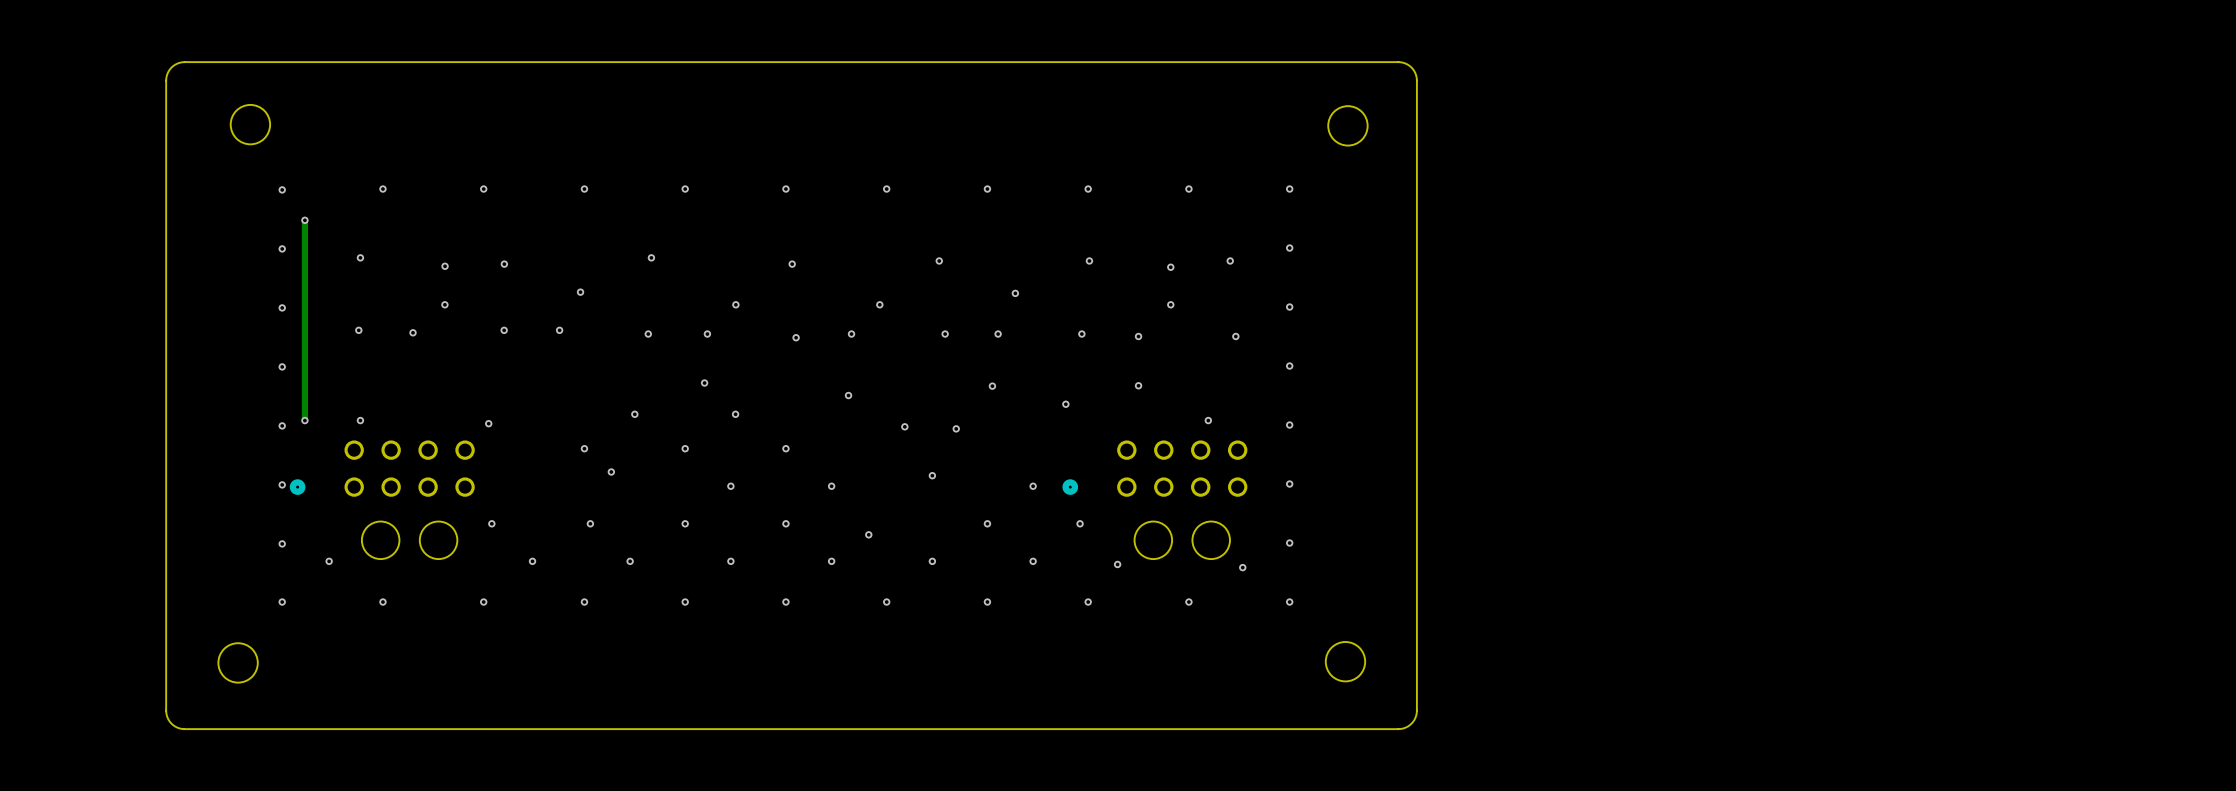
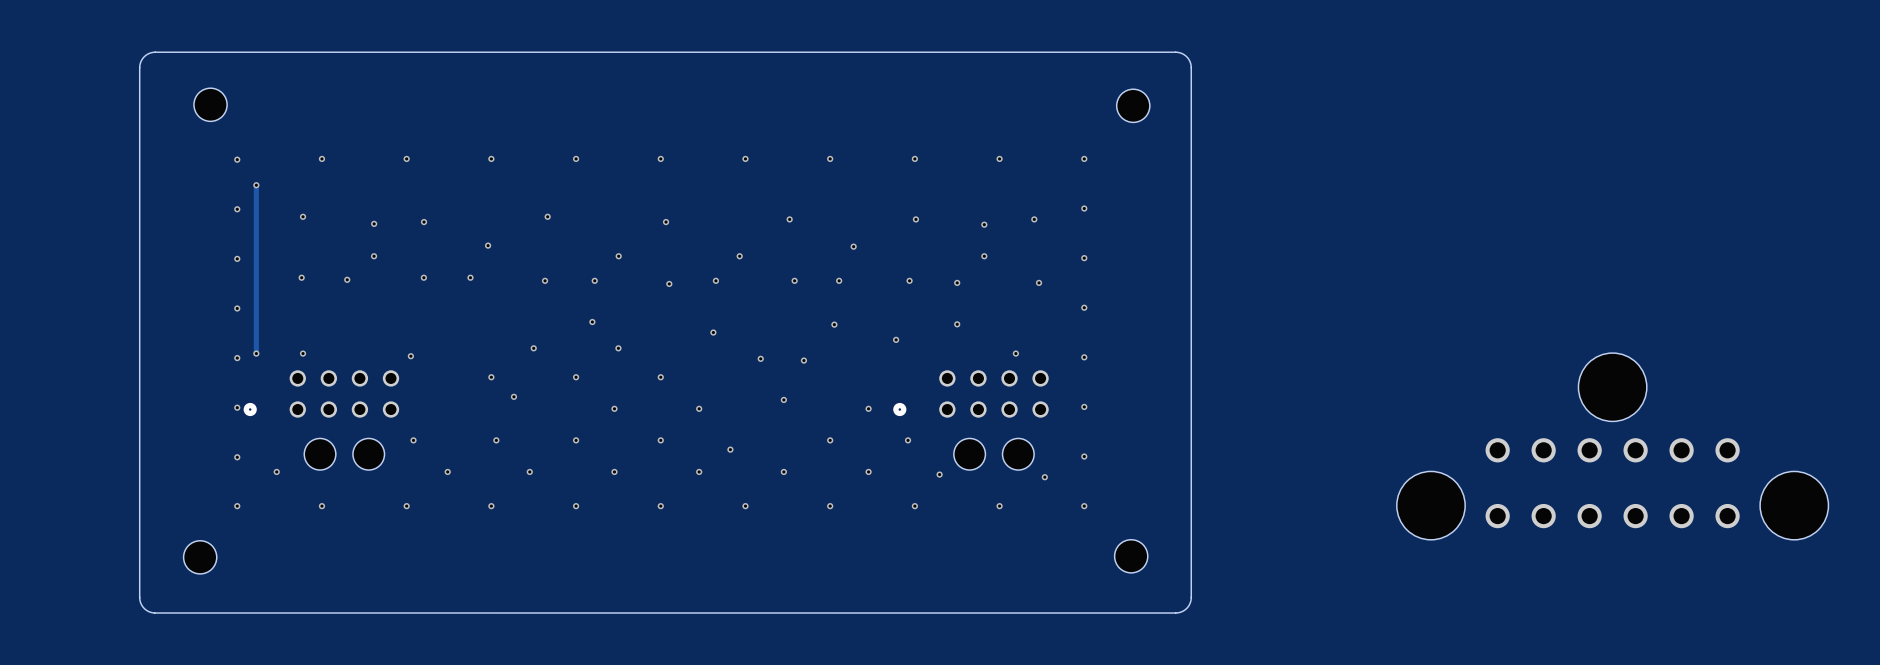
part: none -> (1612, 446)

